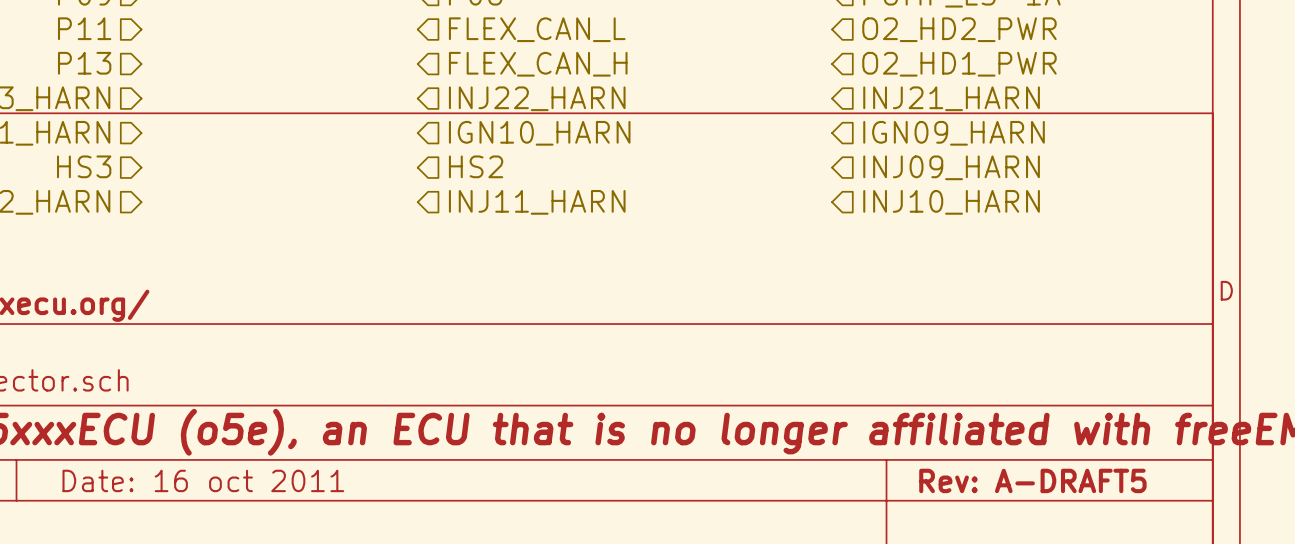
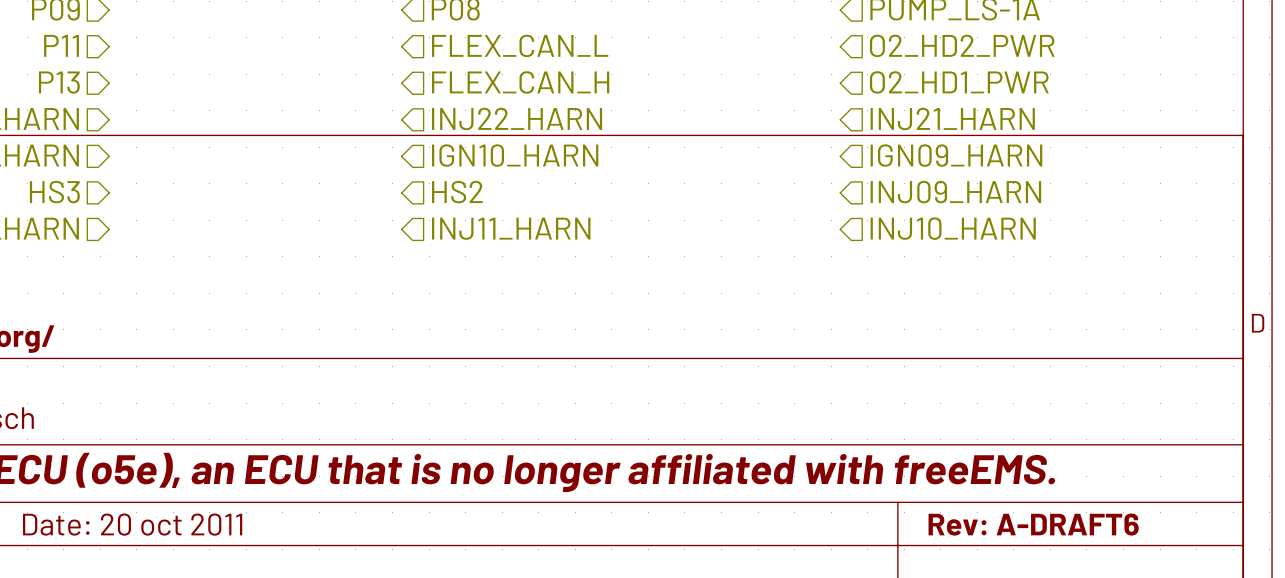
title block: Date: 16 oct 2011 (203, 480) -> Date: 20 oct 2011 (132, 524)
title block: Rev: A-DRAFT5 (1032, 480) -> Rev: A-DRAFT6 (1033, 524)

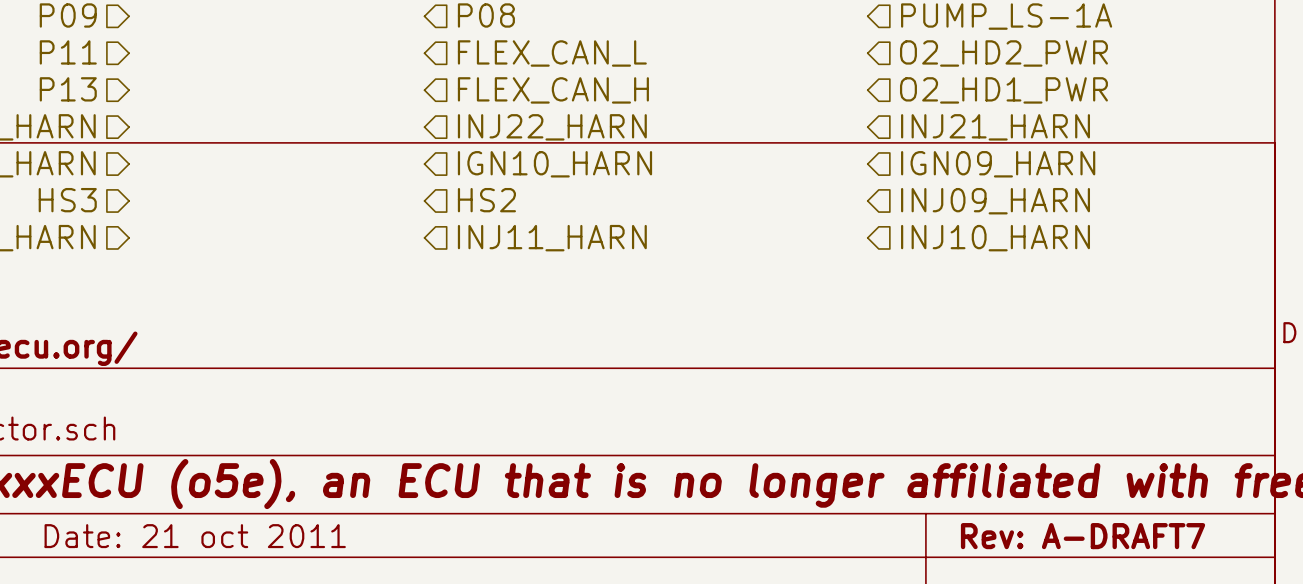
title block: Date: 20 oct 2011 (132, 524) -> Date: 21 oct 2011 (195, 536)
title block: Rev: A-DRAFT6 (1033, 524) -> Rev: A-DRAFT7 (1083, 536)

